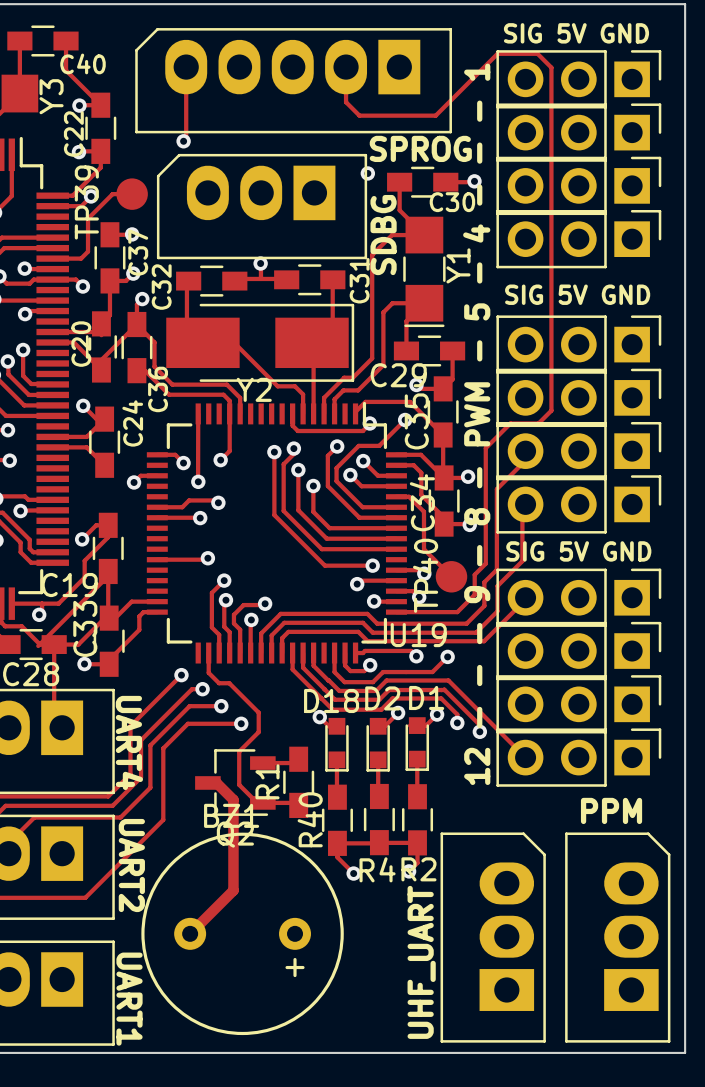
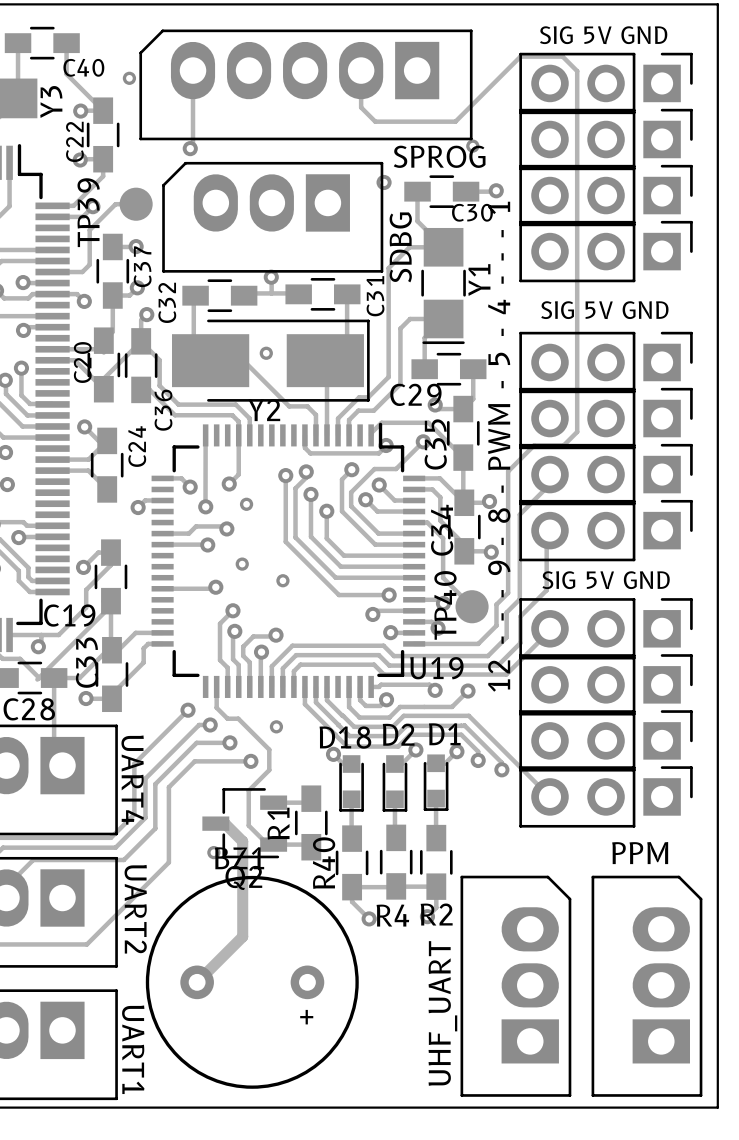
part: none -> (129, 78)
part: none -> (472, 146)
part: none -> (266, 353)
part: none -> (246, 504)
part: none -> (242, 564)
part: none -> (282, 580)
part: none -> (276, 726)
part: none -> (213, 852)

